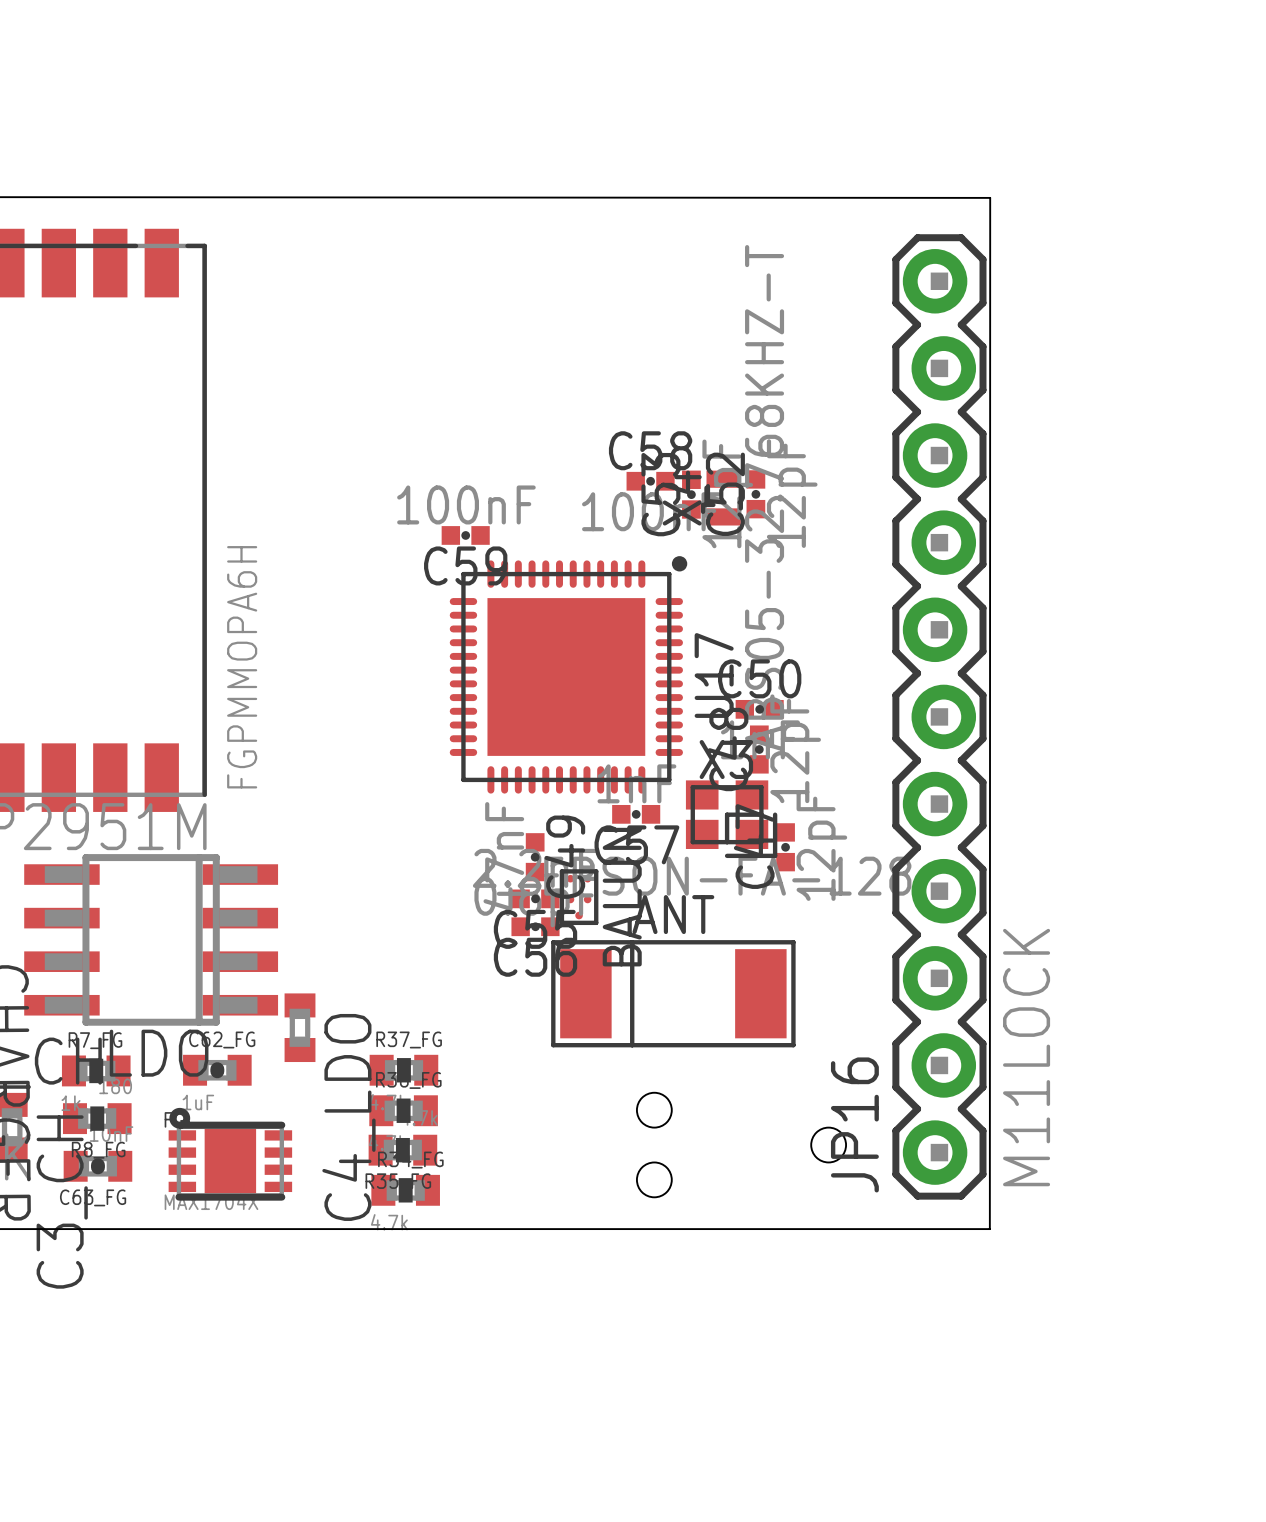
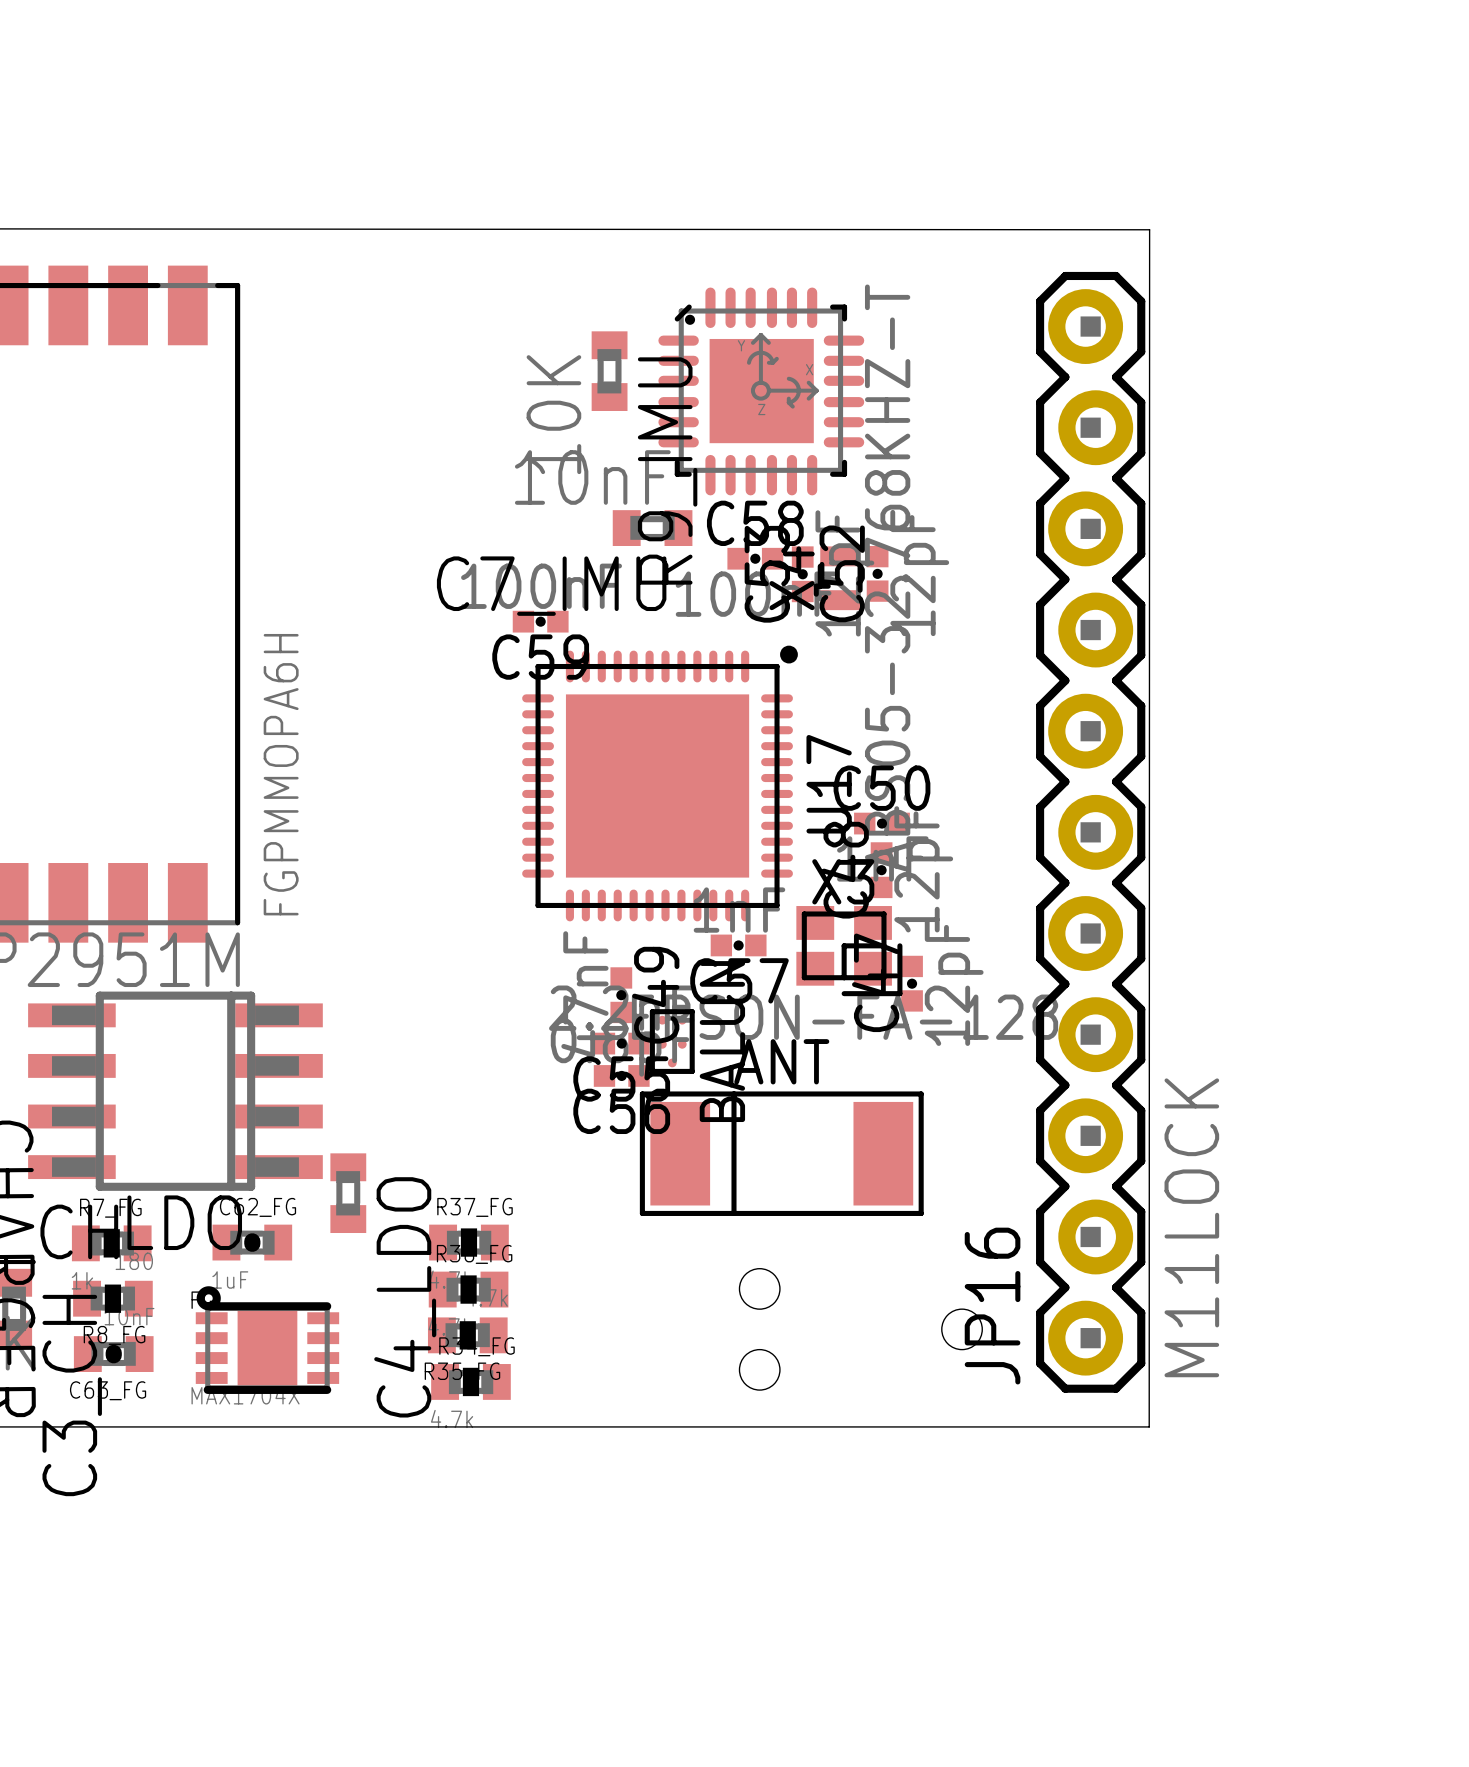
R9_IMU: none -> 10K (609, 371)
part: none -> (761, 391)
C7_IMU: none -> 10nF (652, 528)

